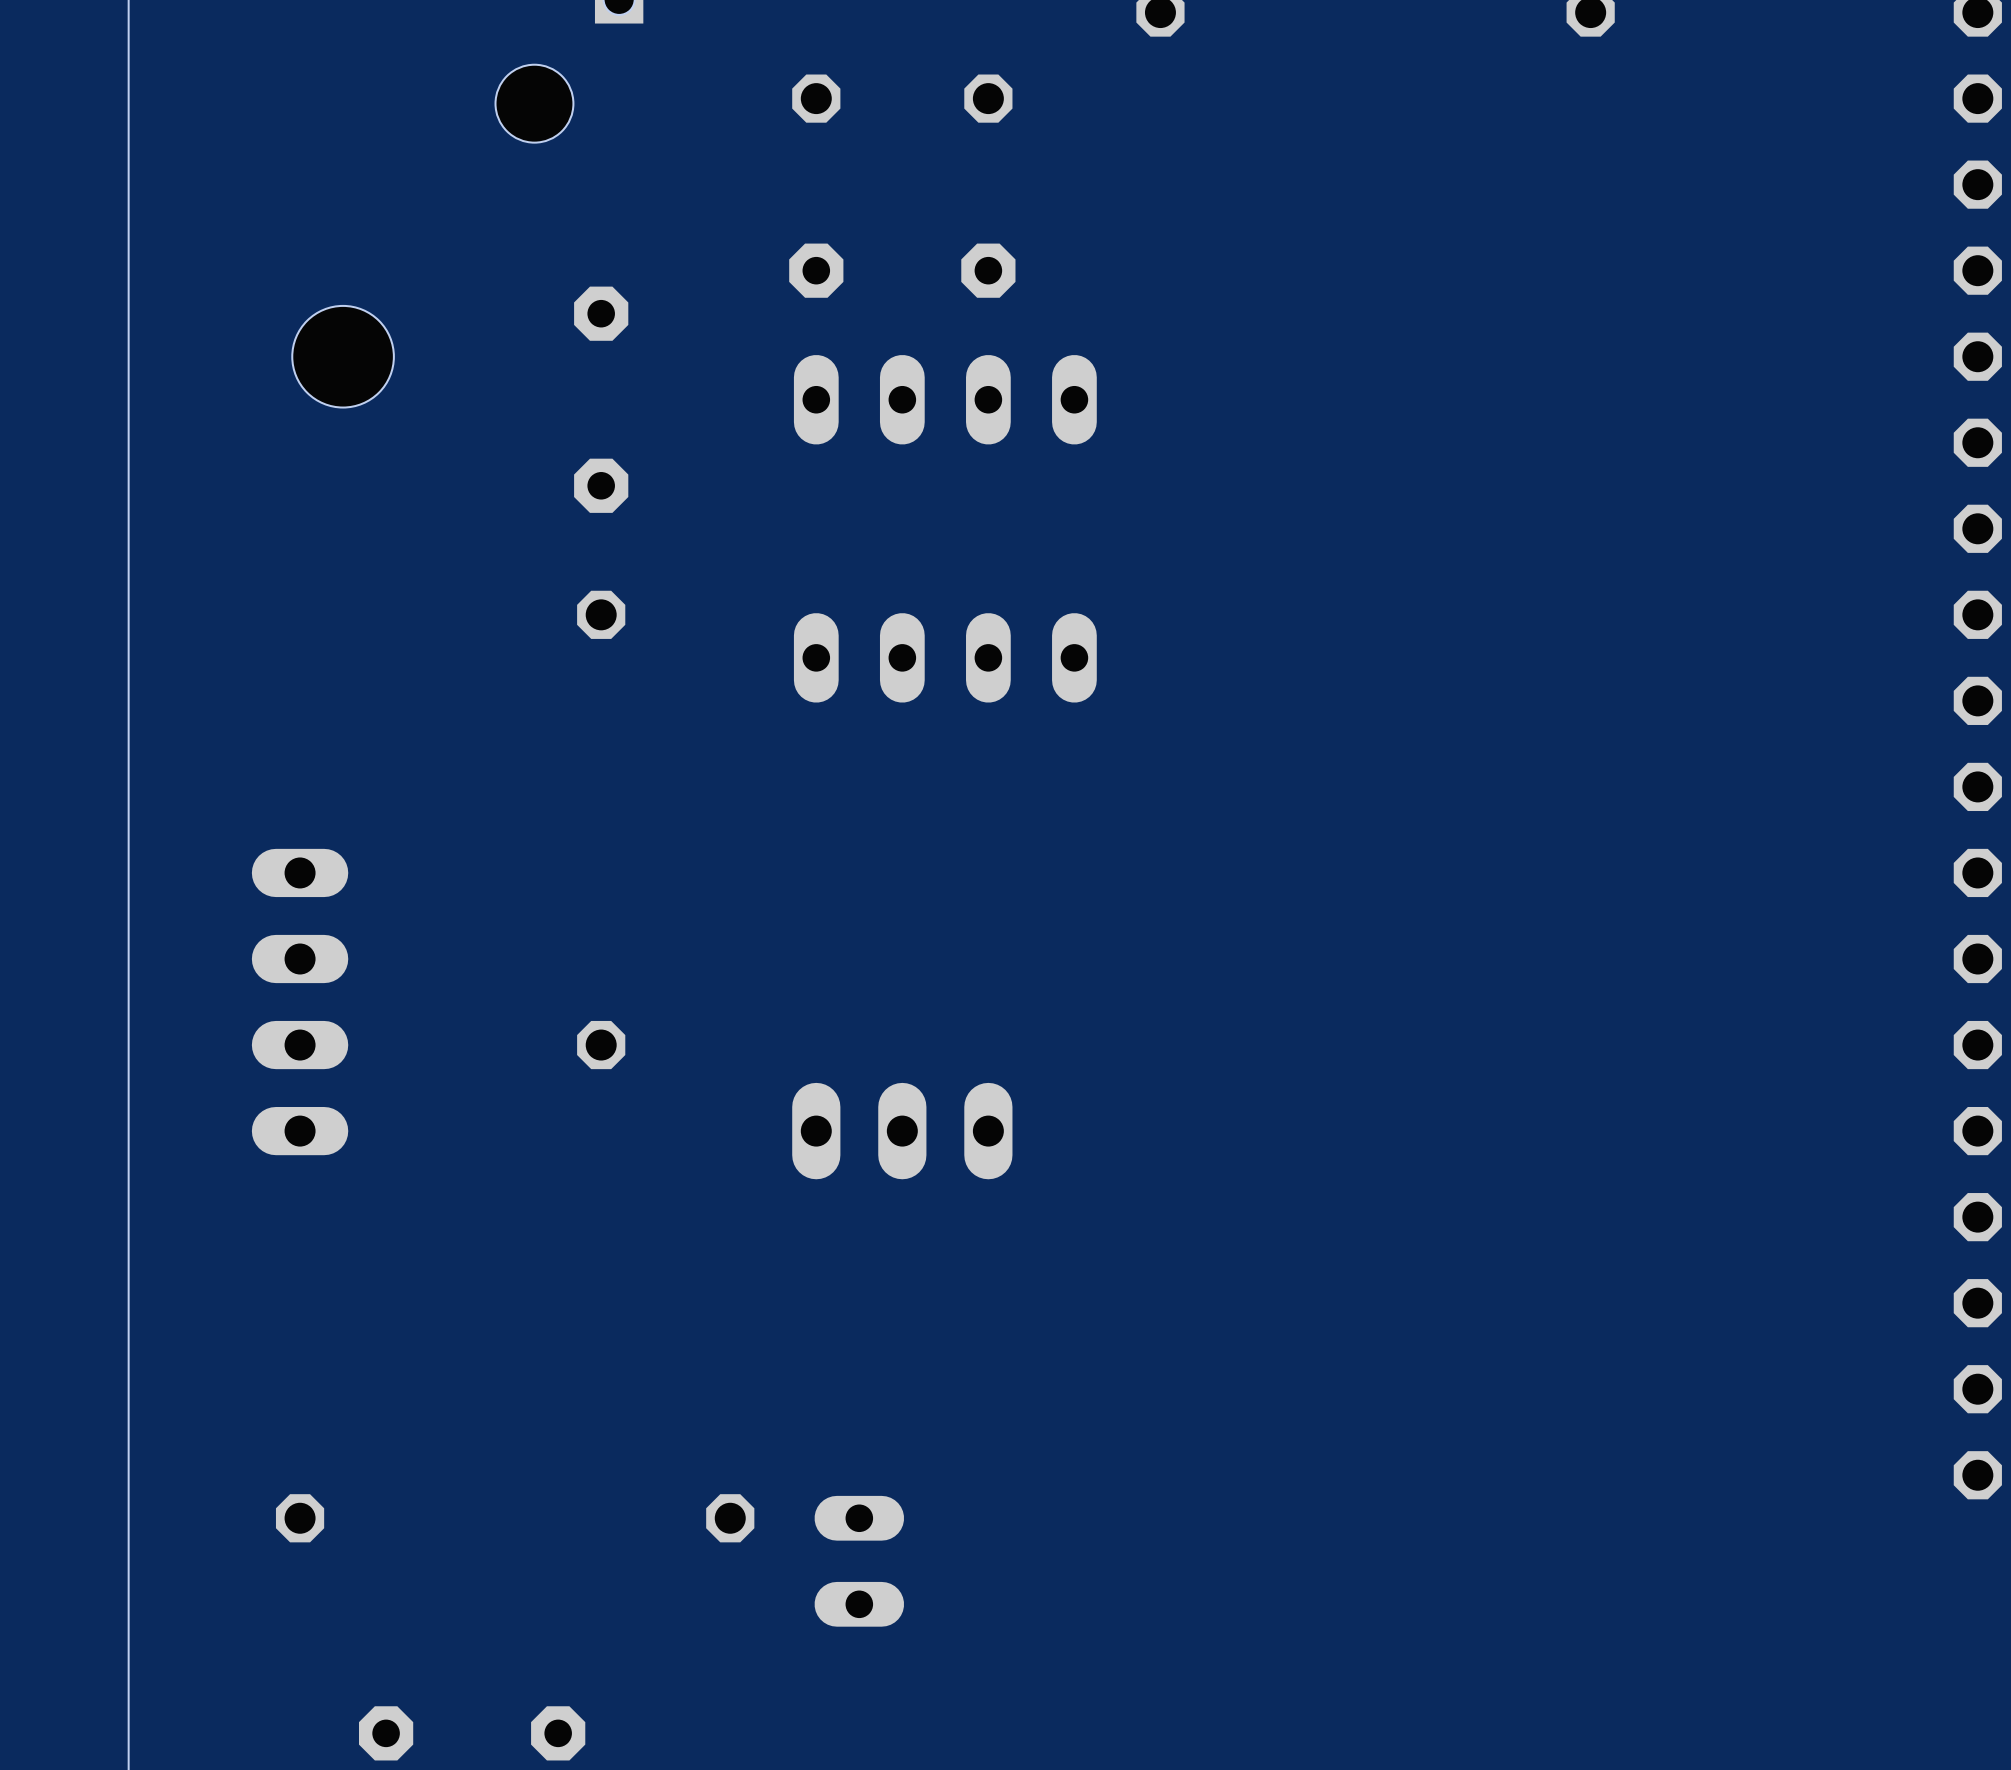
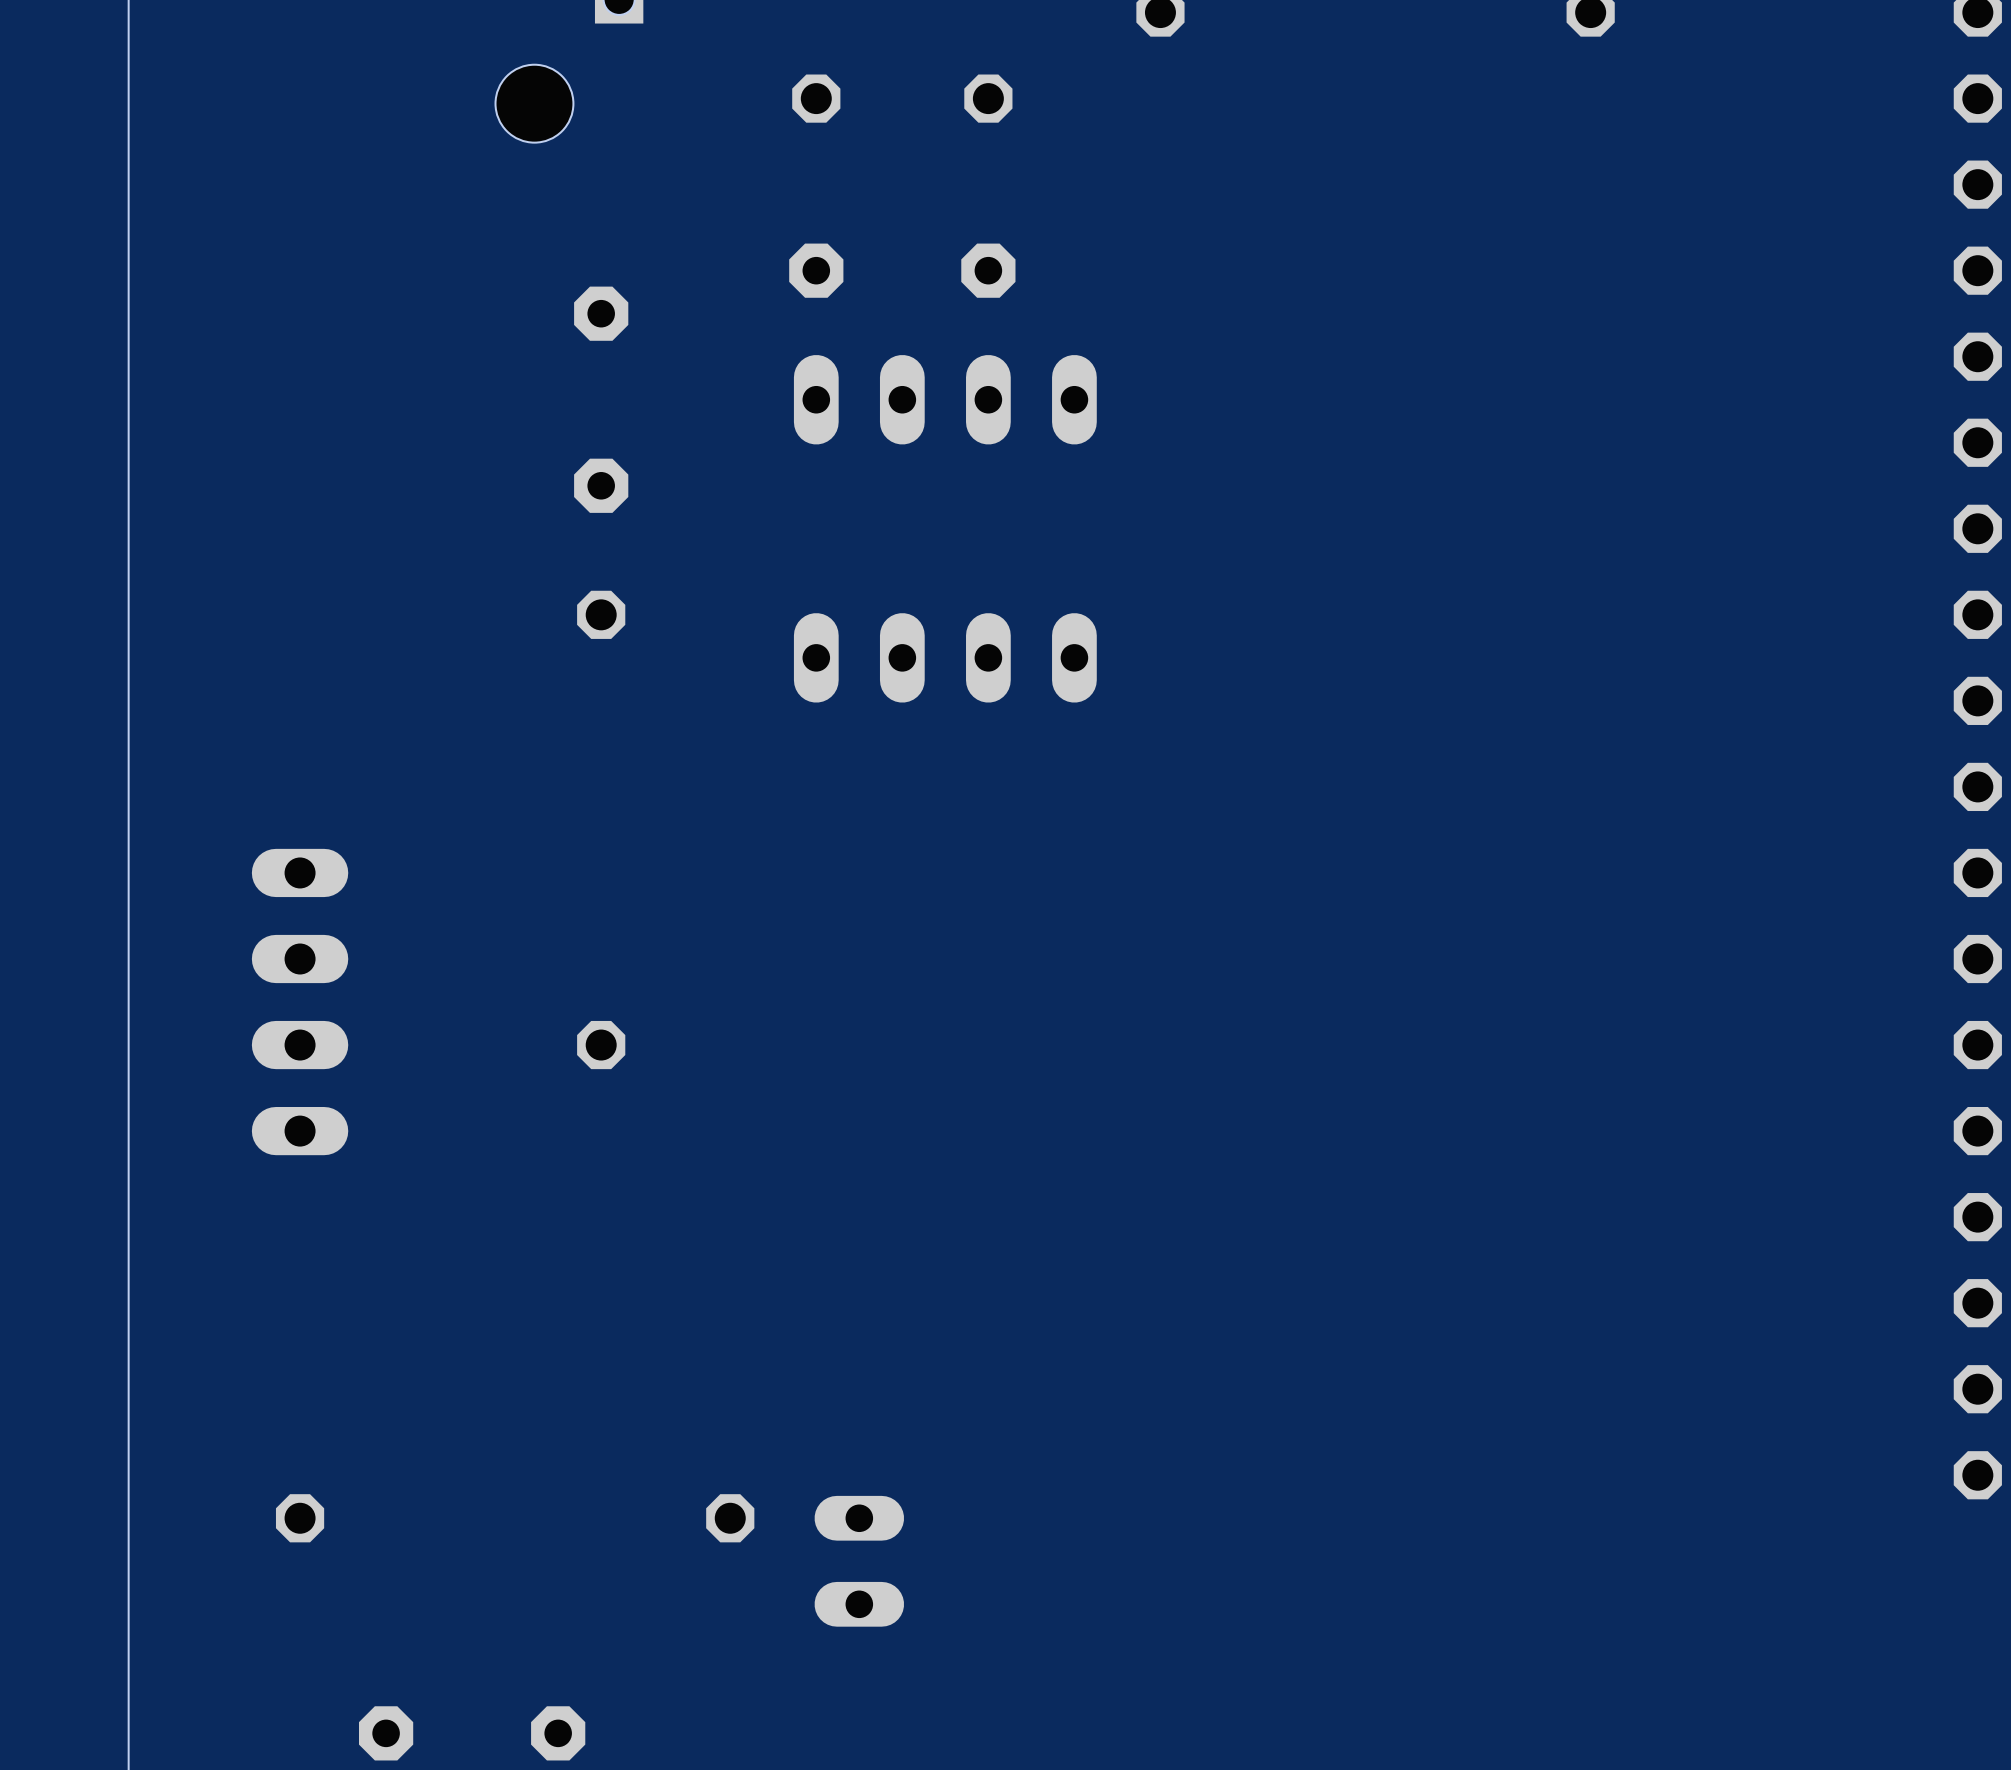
part: (343, 356) -> none
part: (902, 1131) -> none

